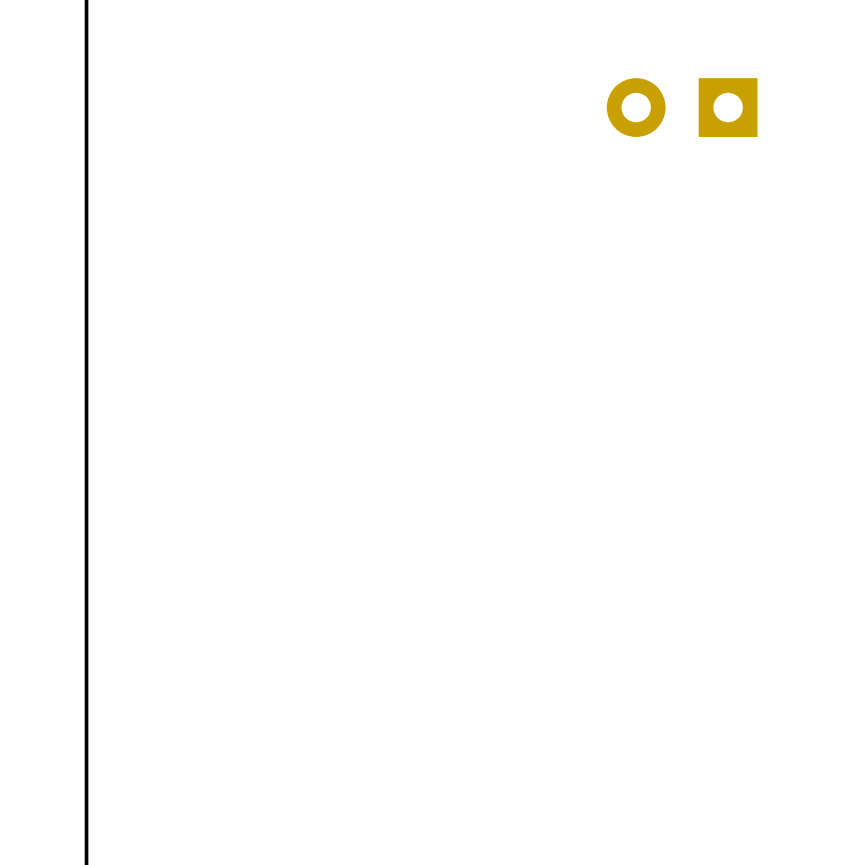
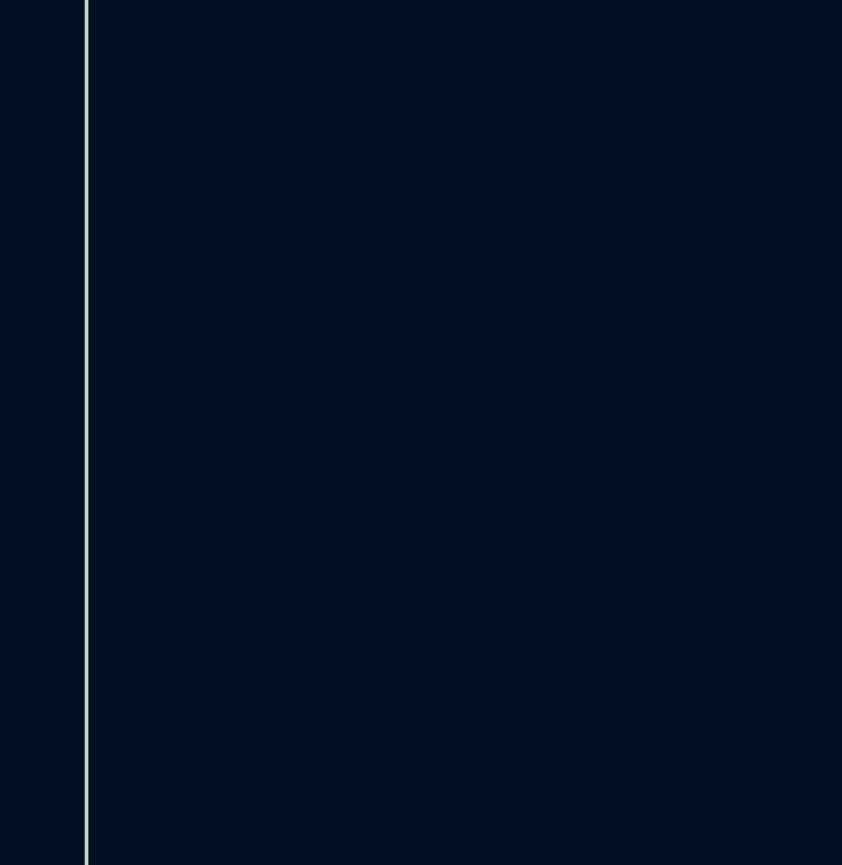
part: (682, 107) -> none

